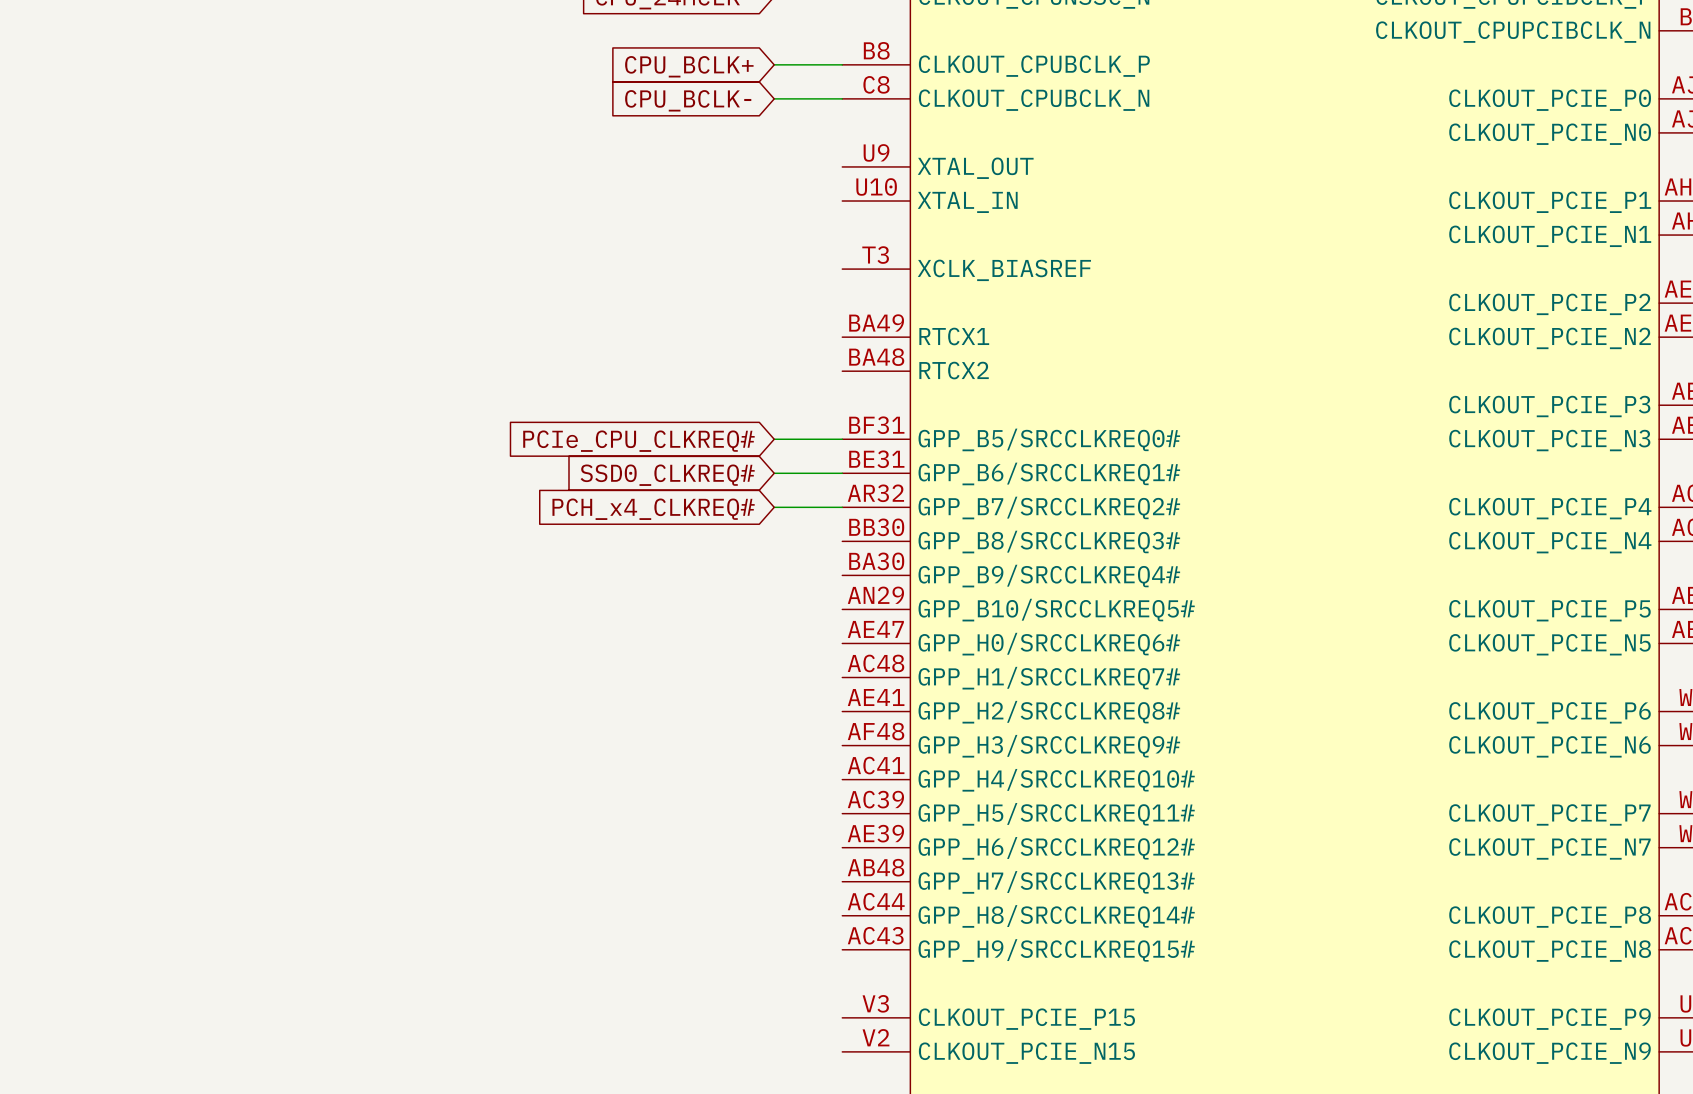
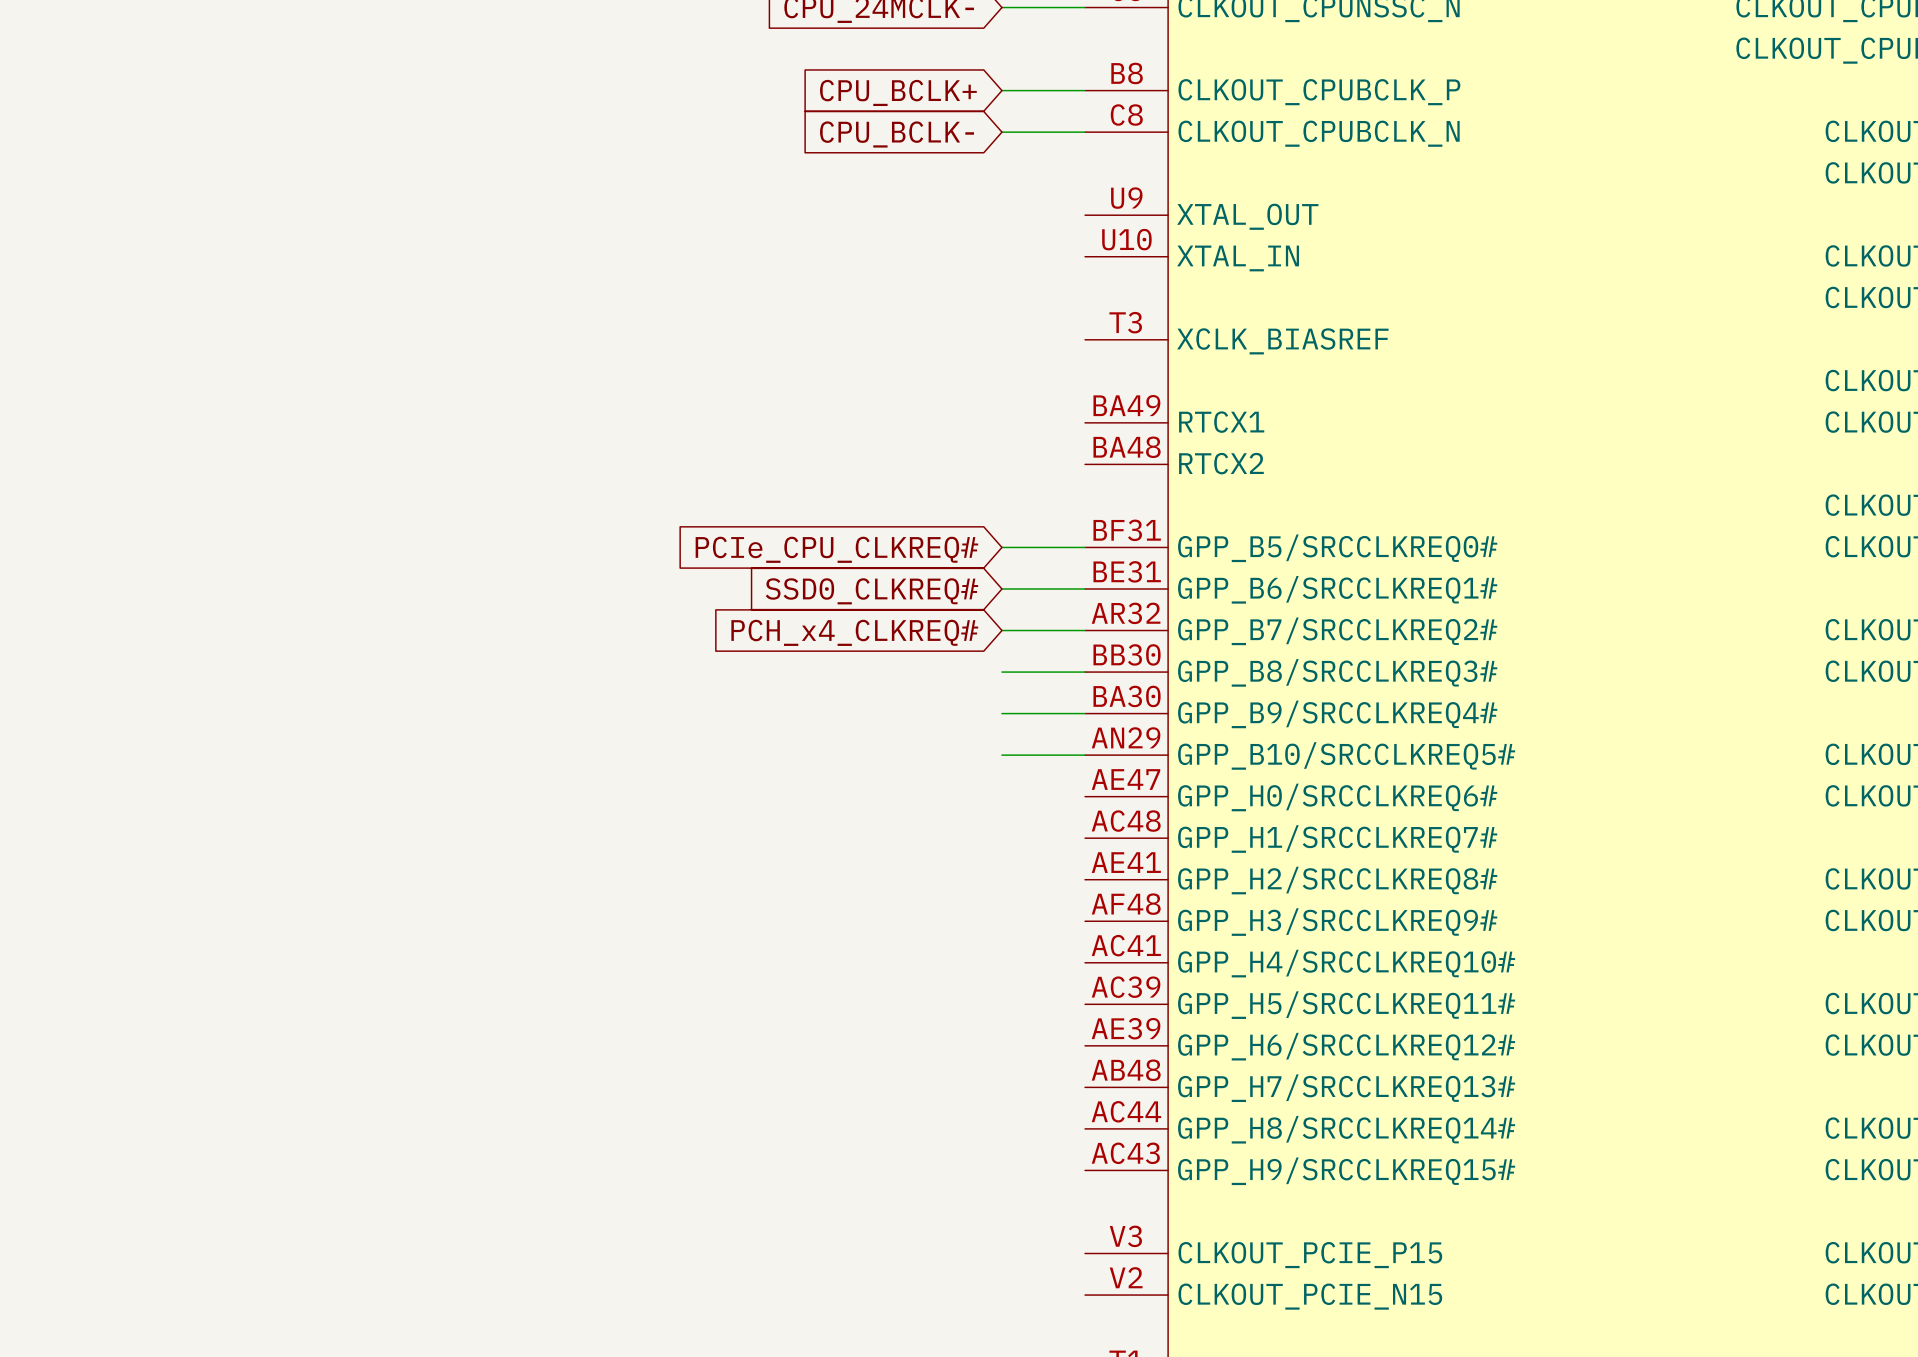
wire: none -> (1001, 672) (1085, 672)
wire: none -> (1001, 713) (1085, 713)
wire: none -> (1001, 755) (1085, 755)

